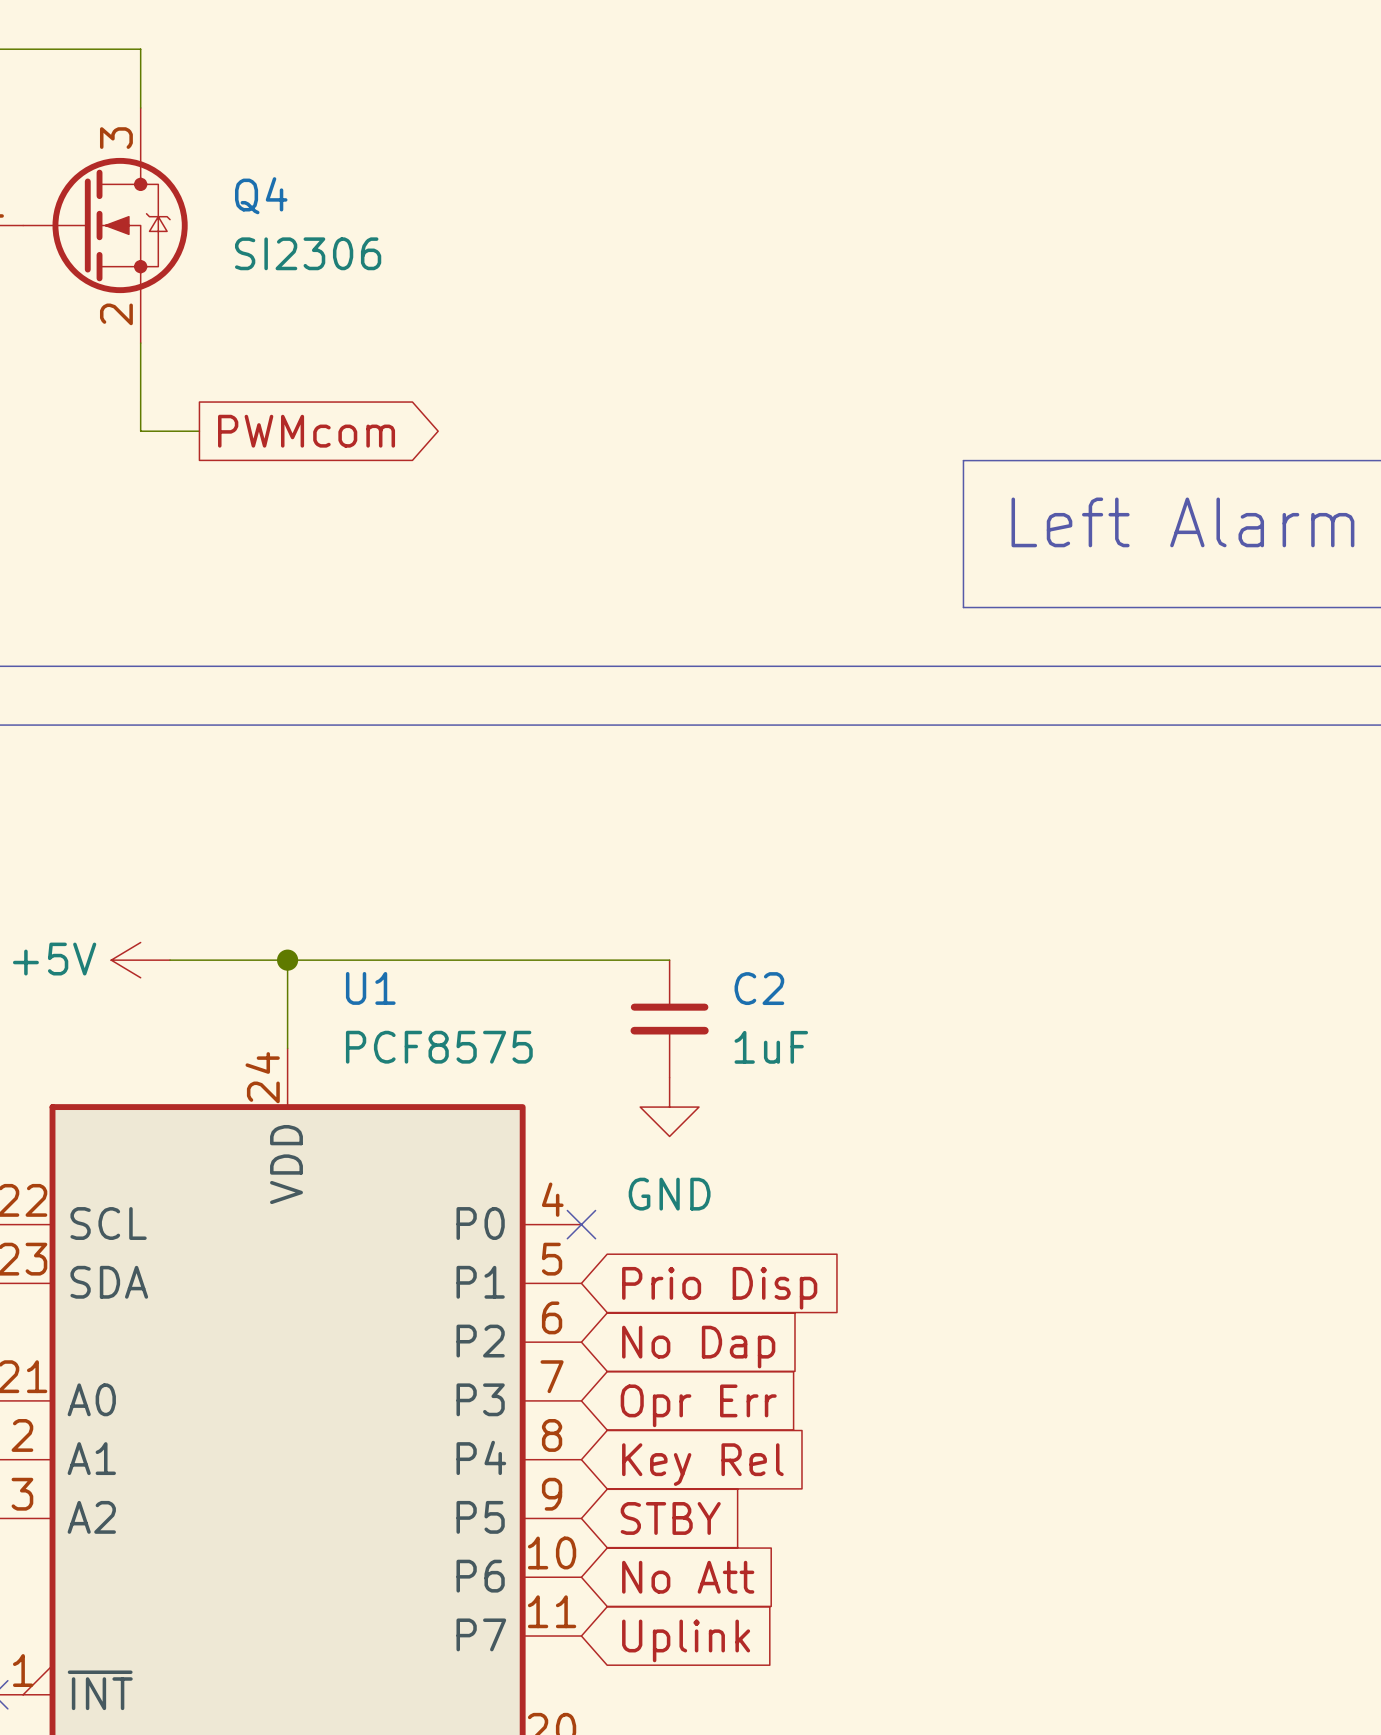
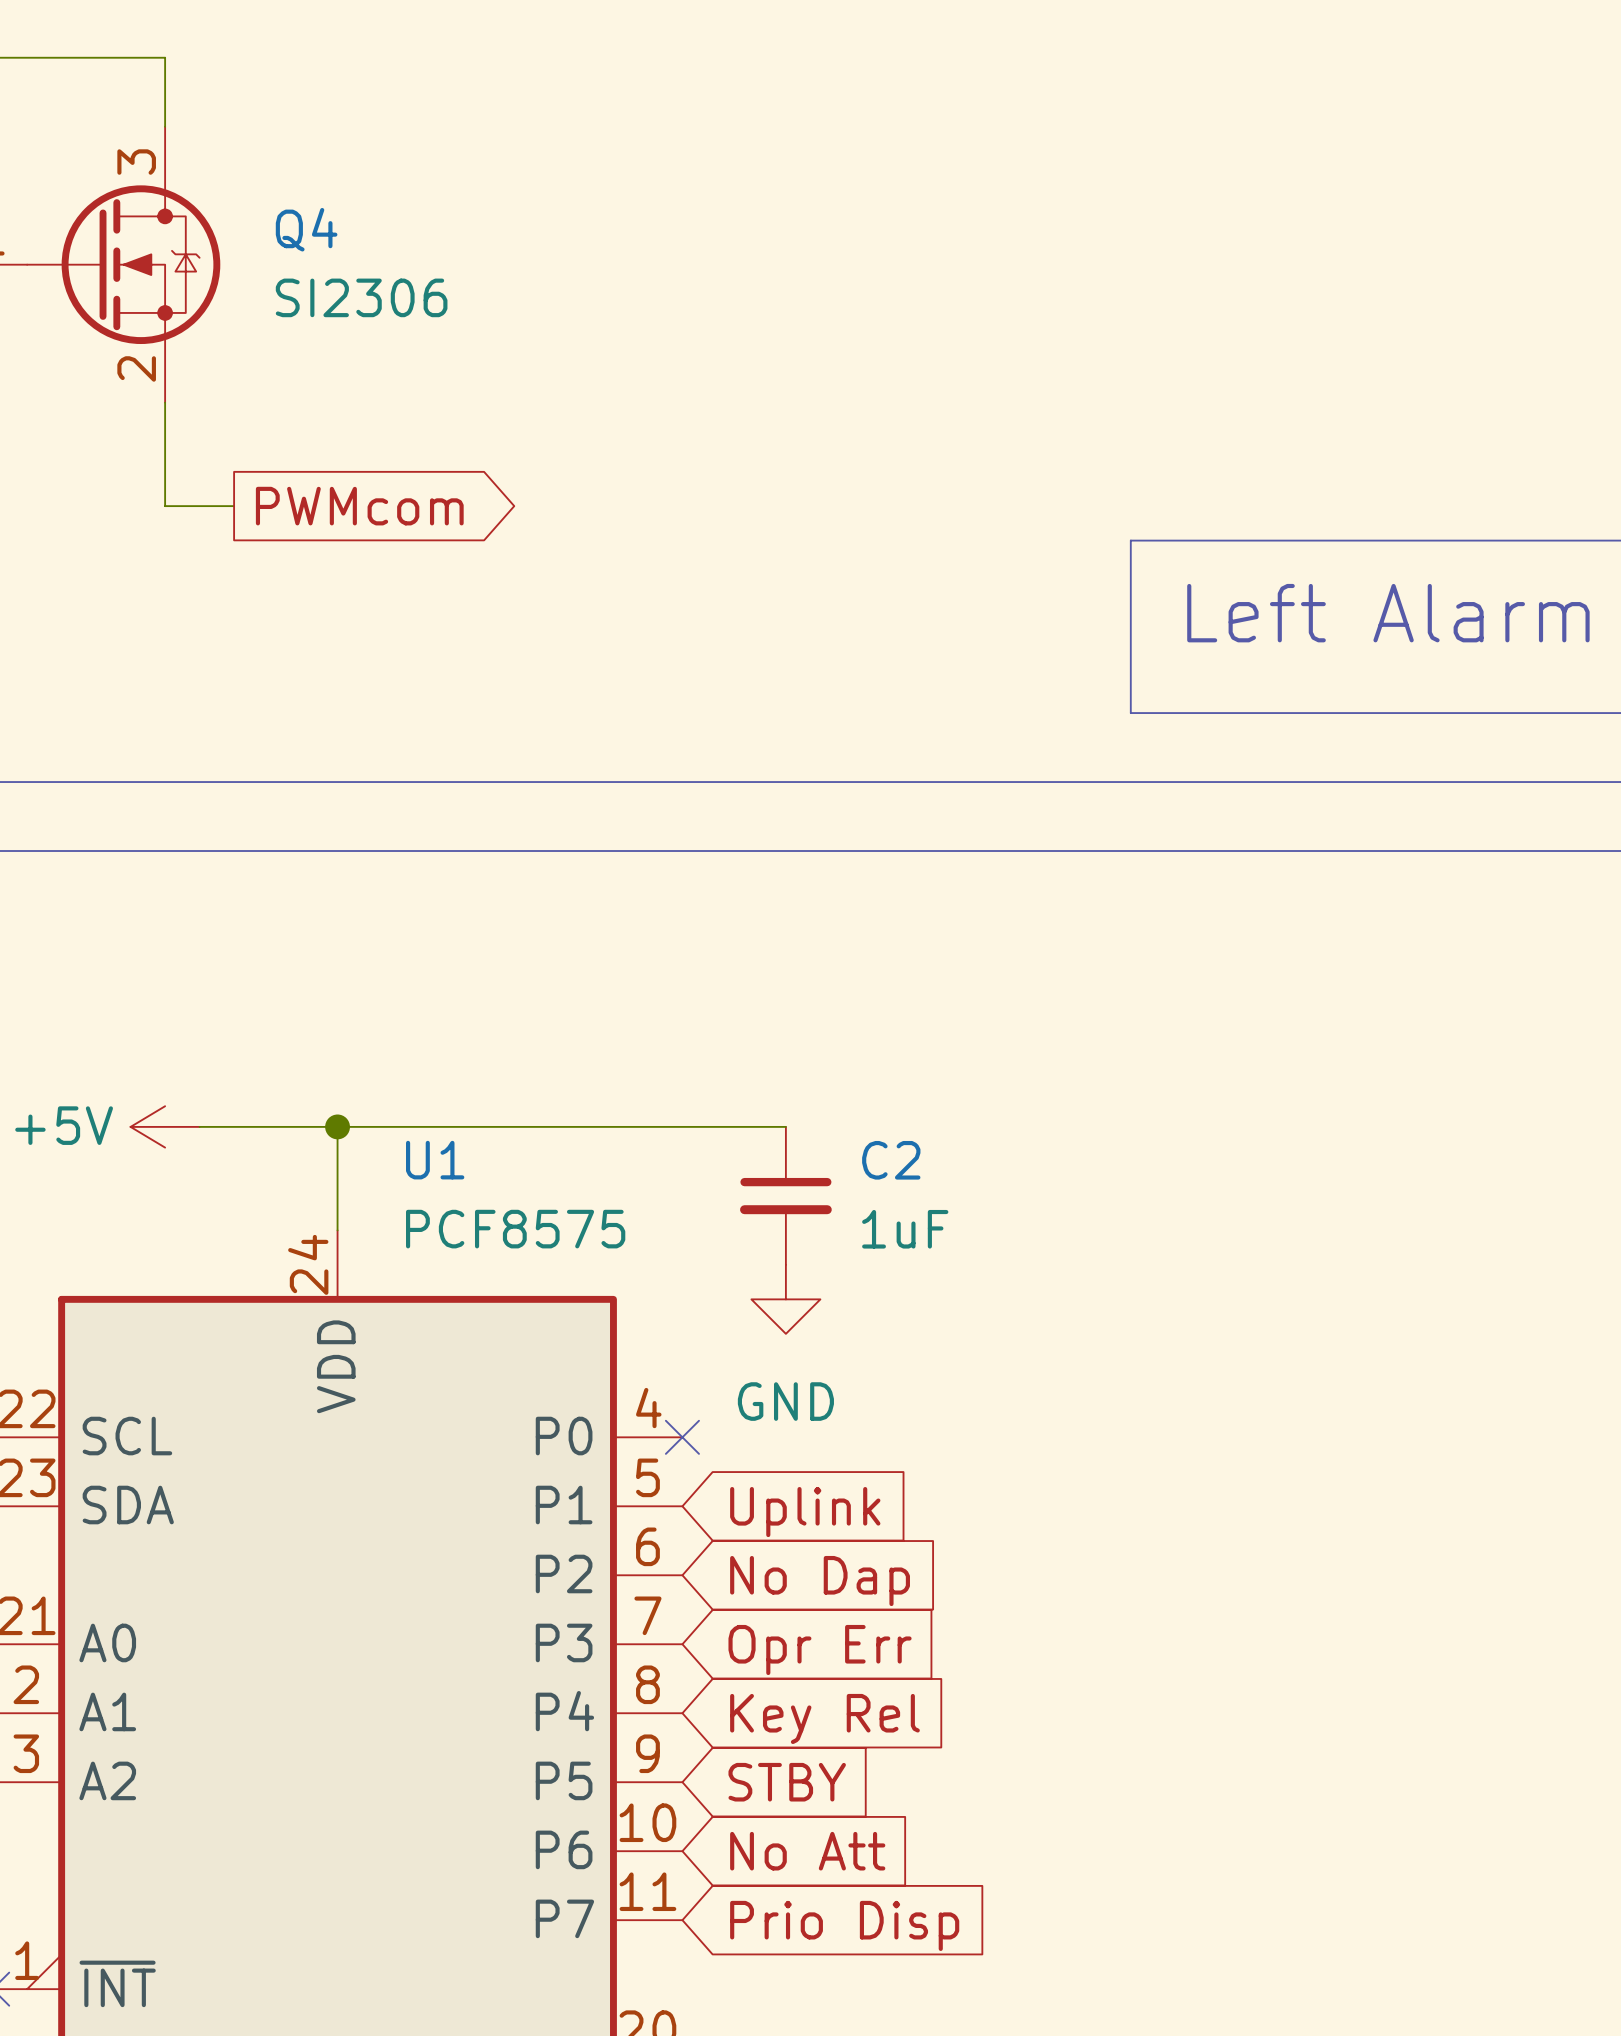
global label: Prio Disp (719, 1288) -> Uplink (805, 1512)
global label: Uplink (686, 1640) -> Prio Disp (844, 1925)

